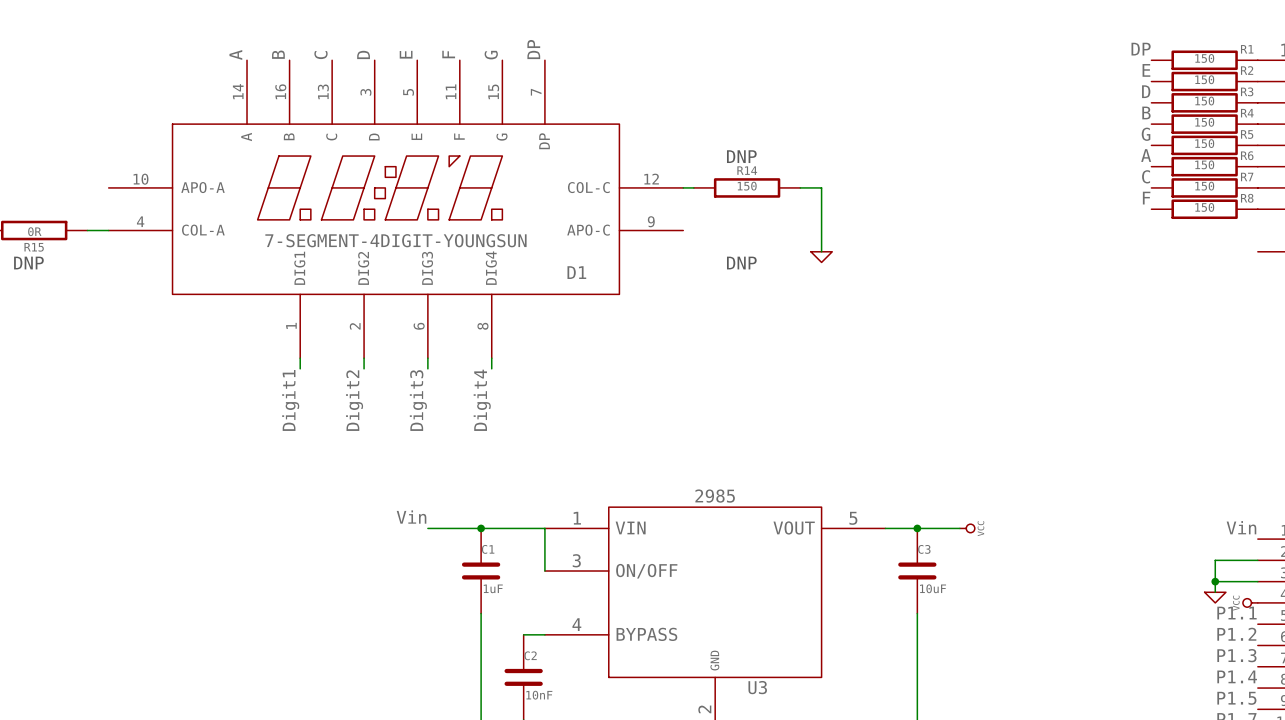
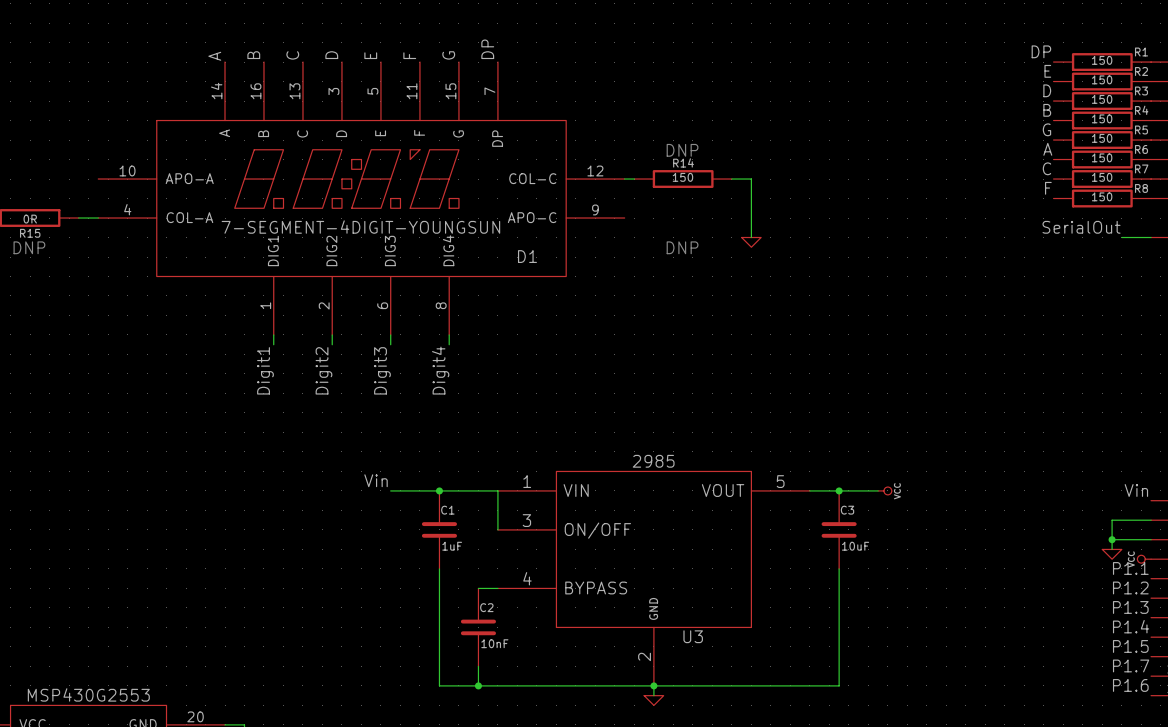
label: none -> SerialOut (1081, 227)
wire: none -> (1121, 237) (1151, 237)

